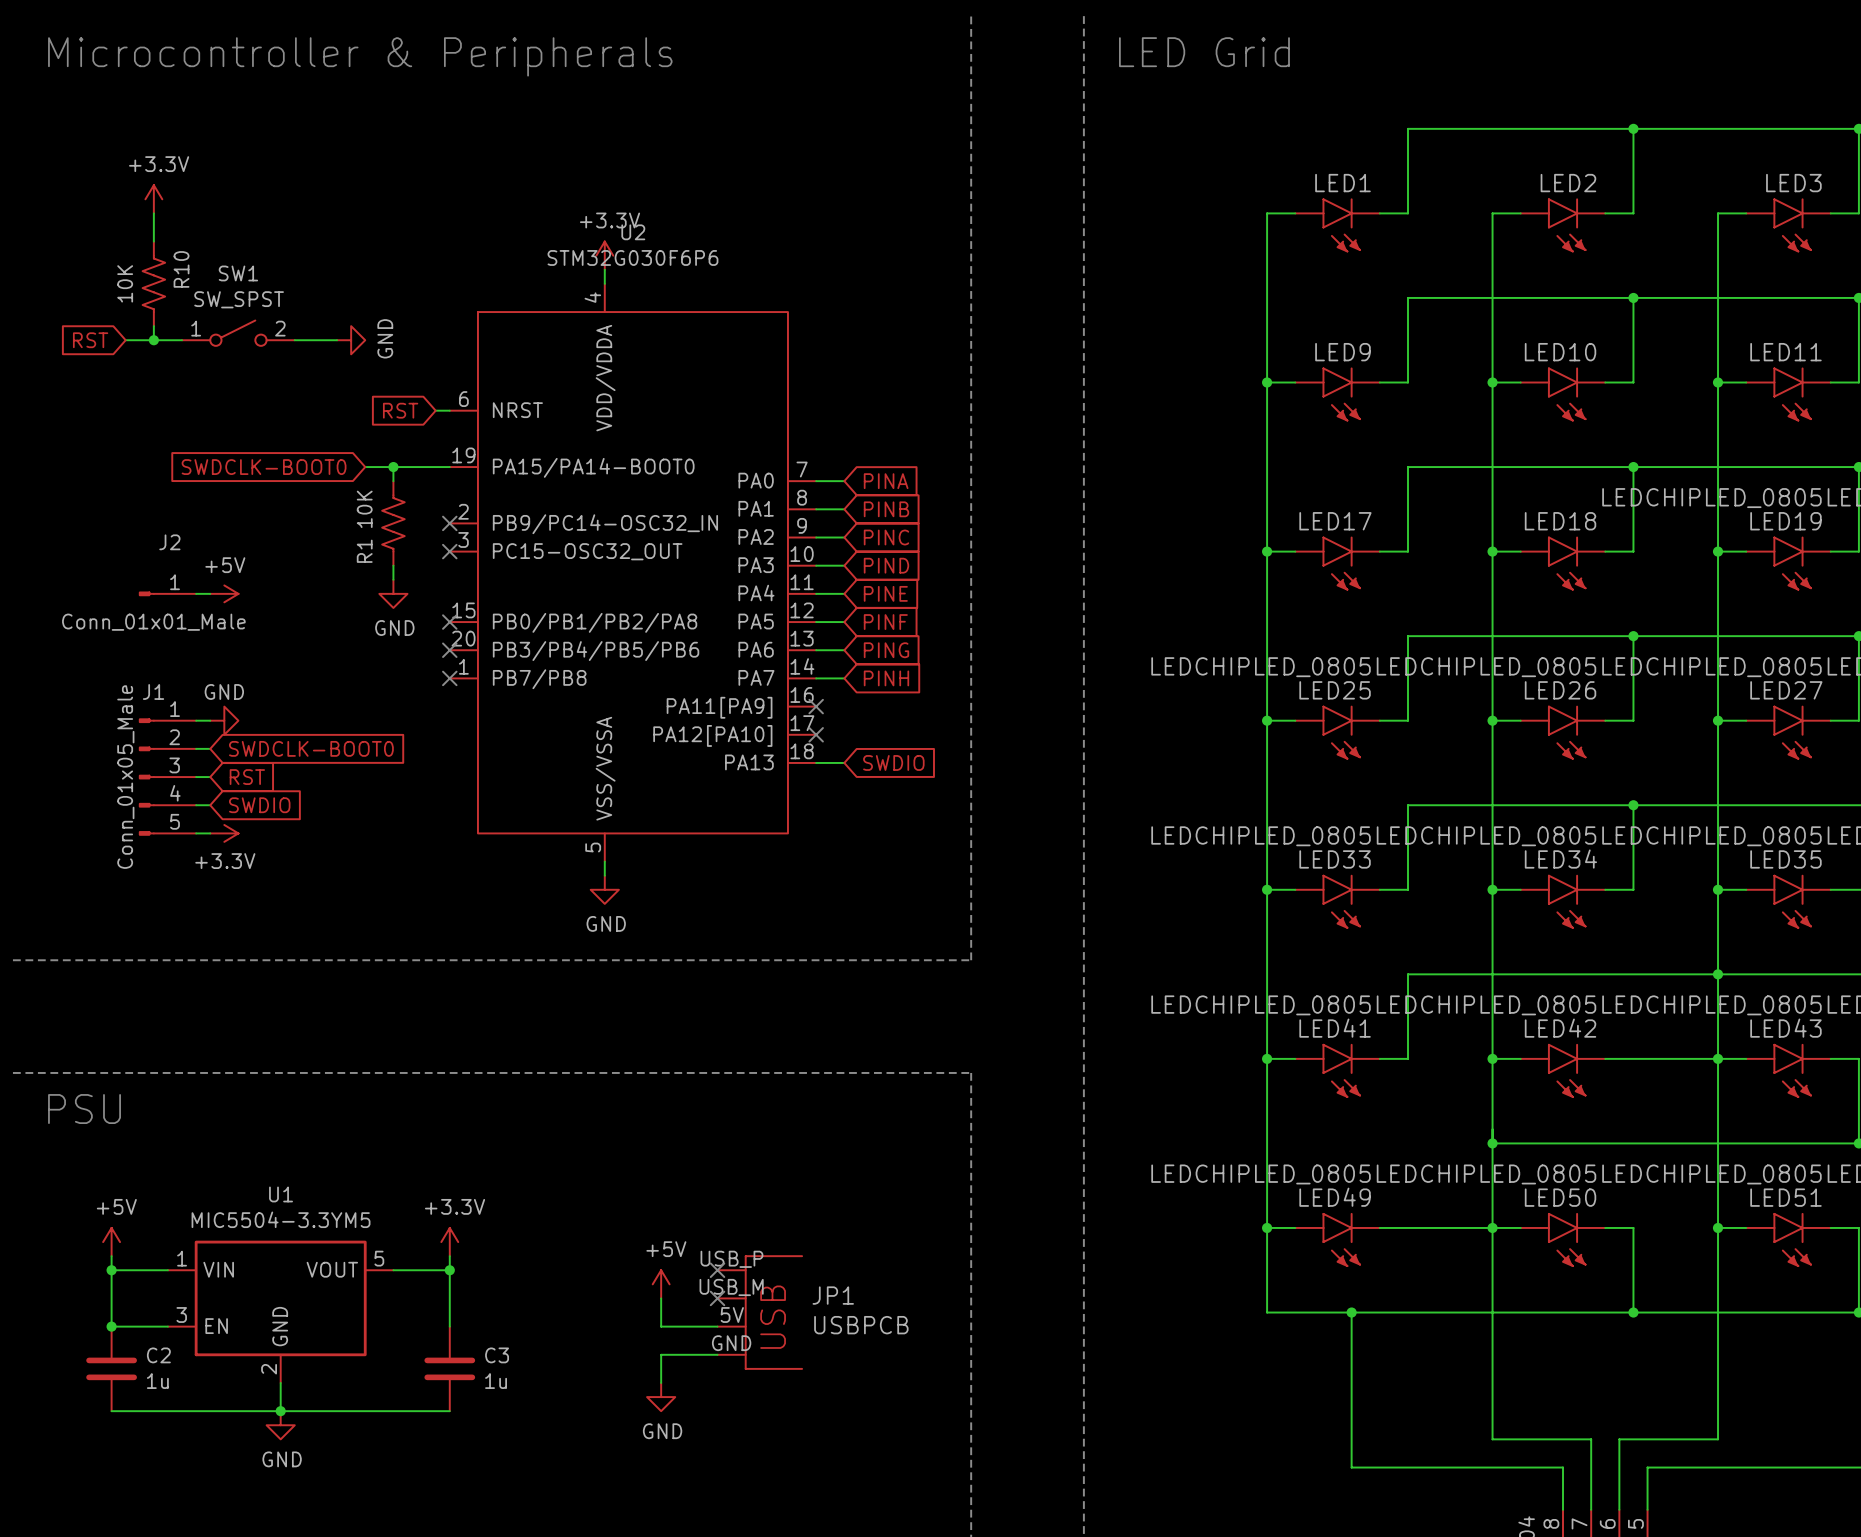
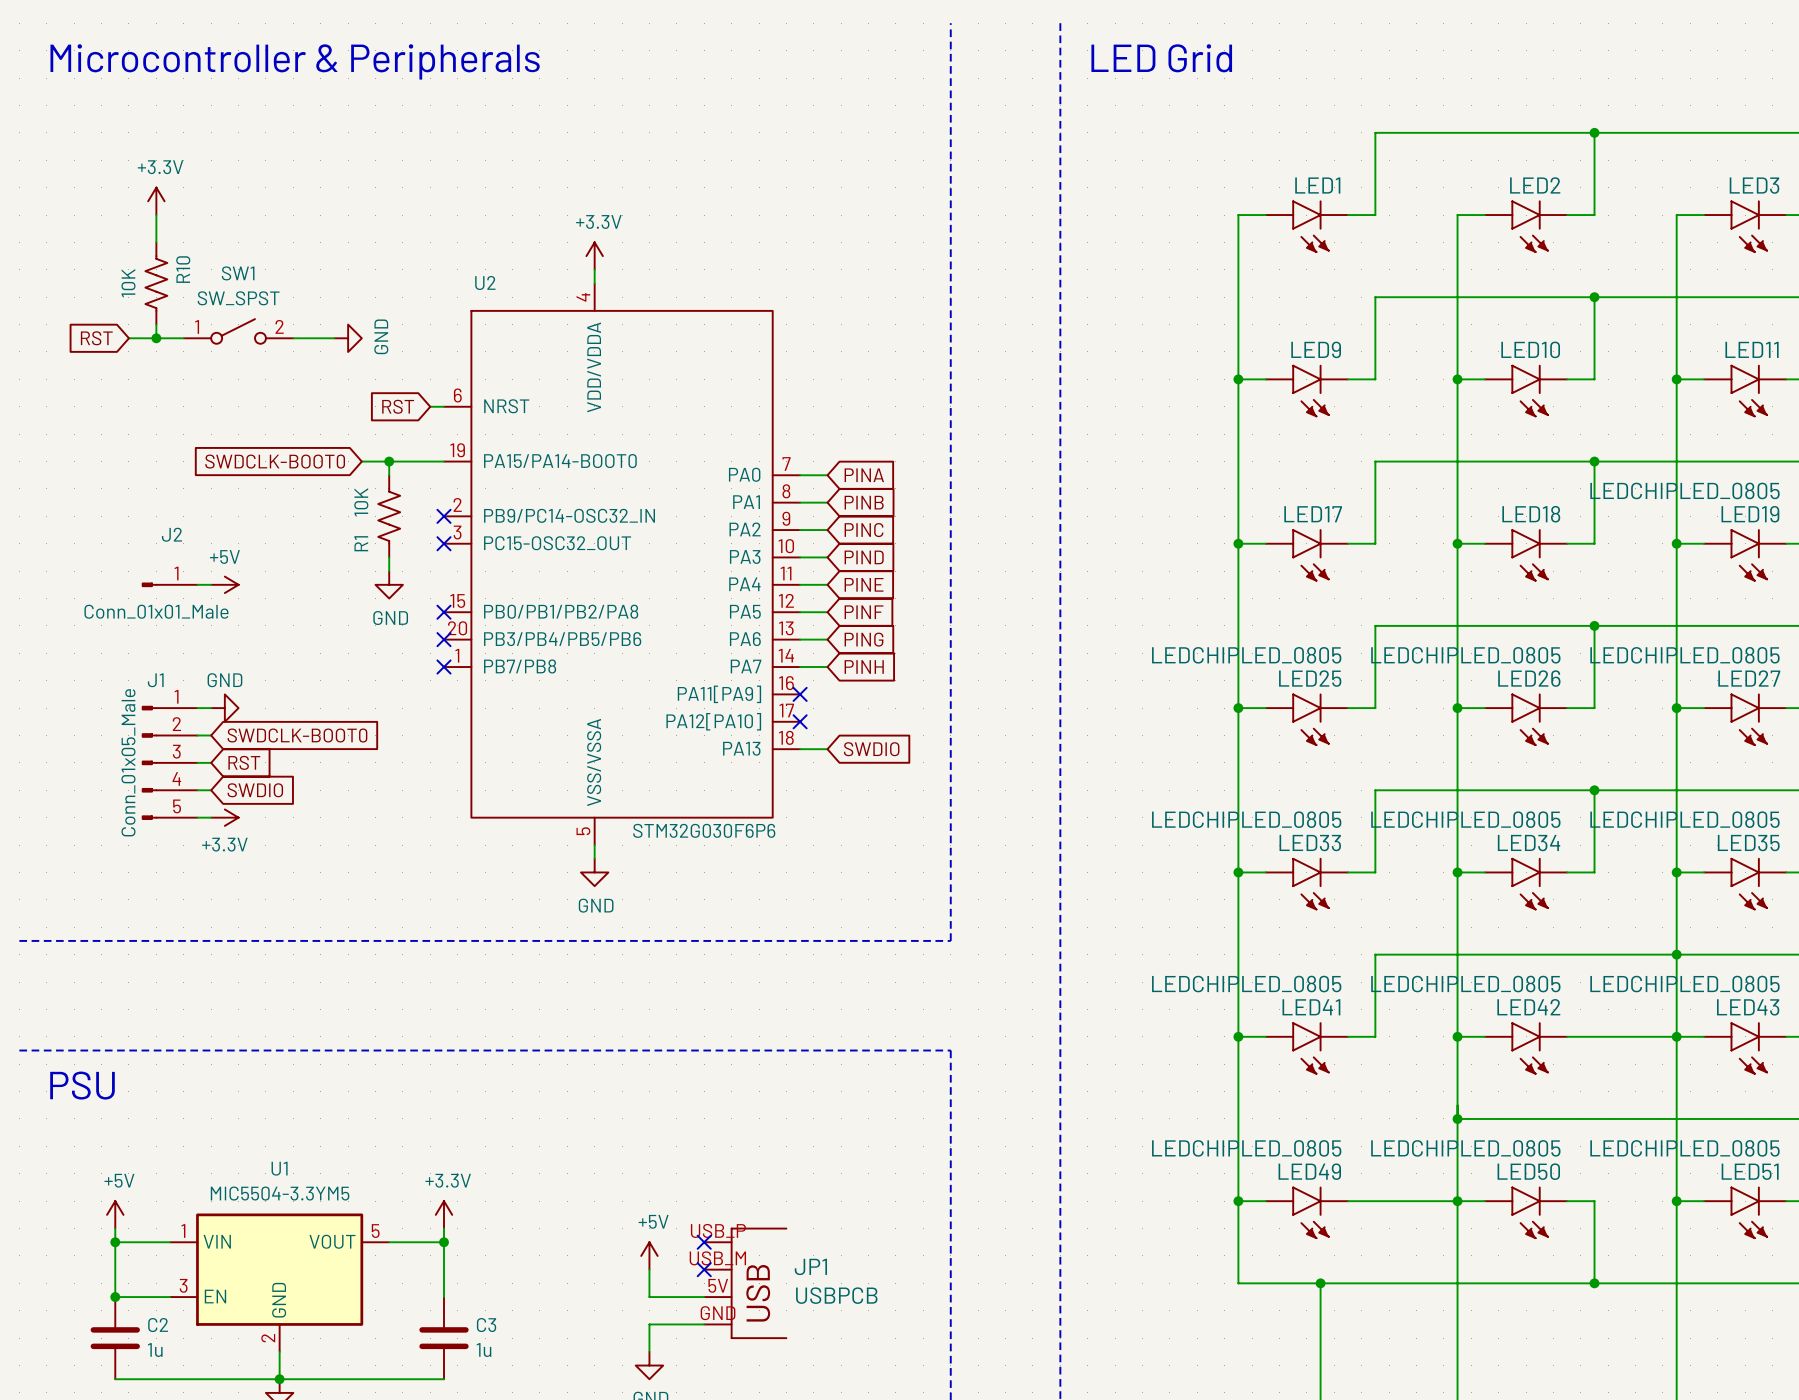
U2 name position: U2 (633, 232) -> U2 (485, 282)
U2 value position: STM32G030F6P6 (632, 257) -> STM32G030F6P6 (704, 830)

